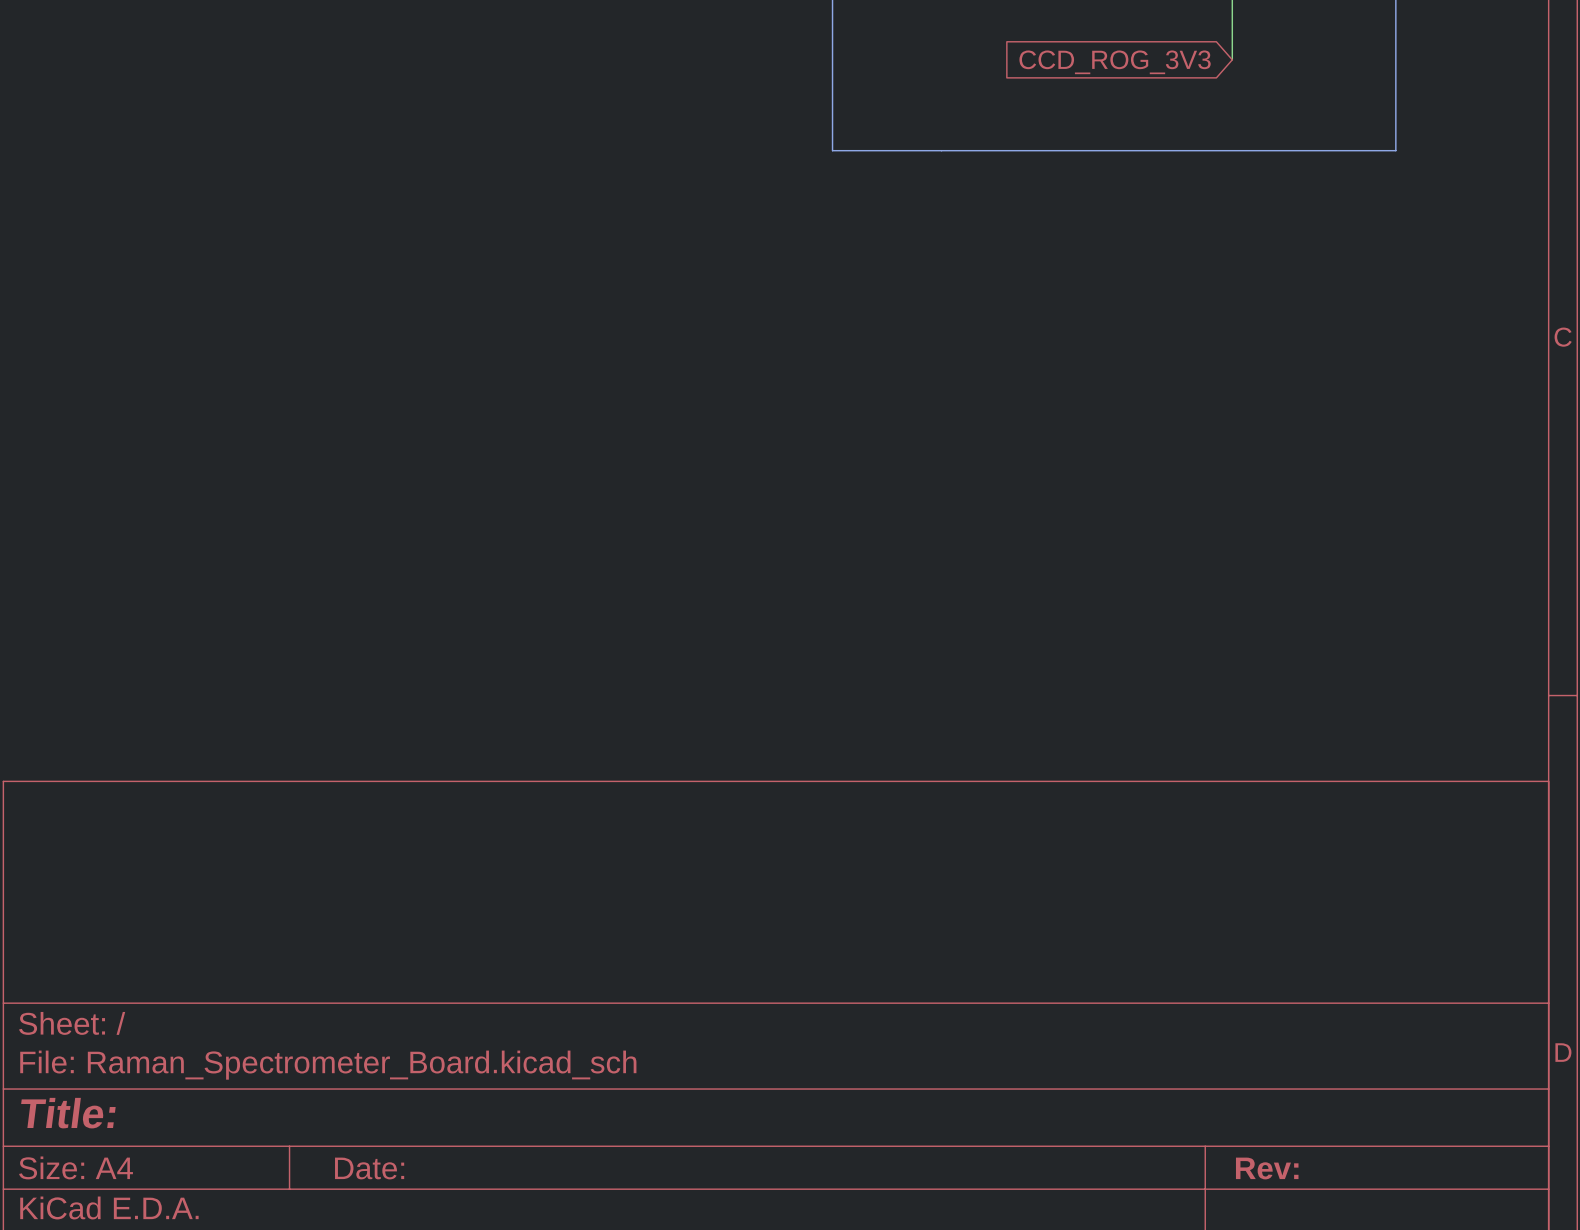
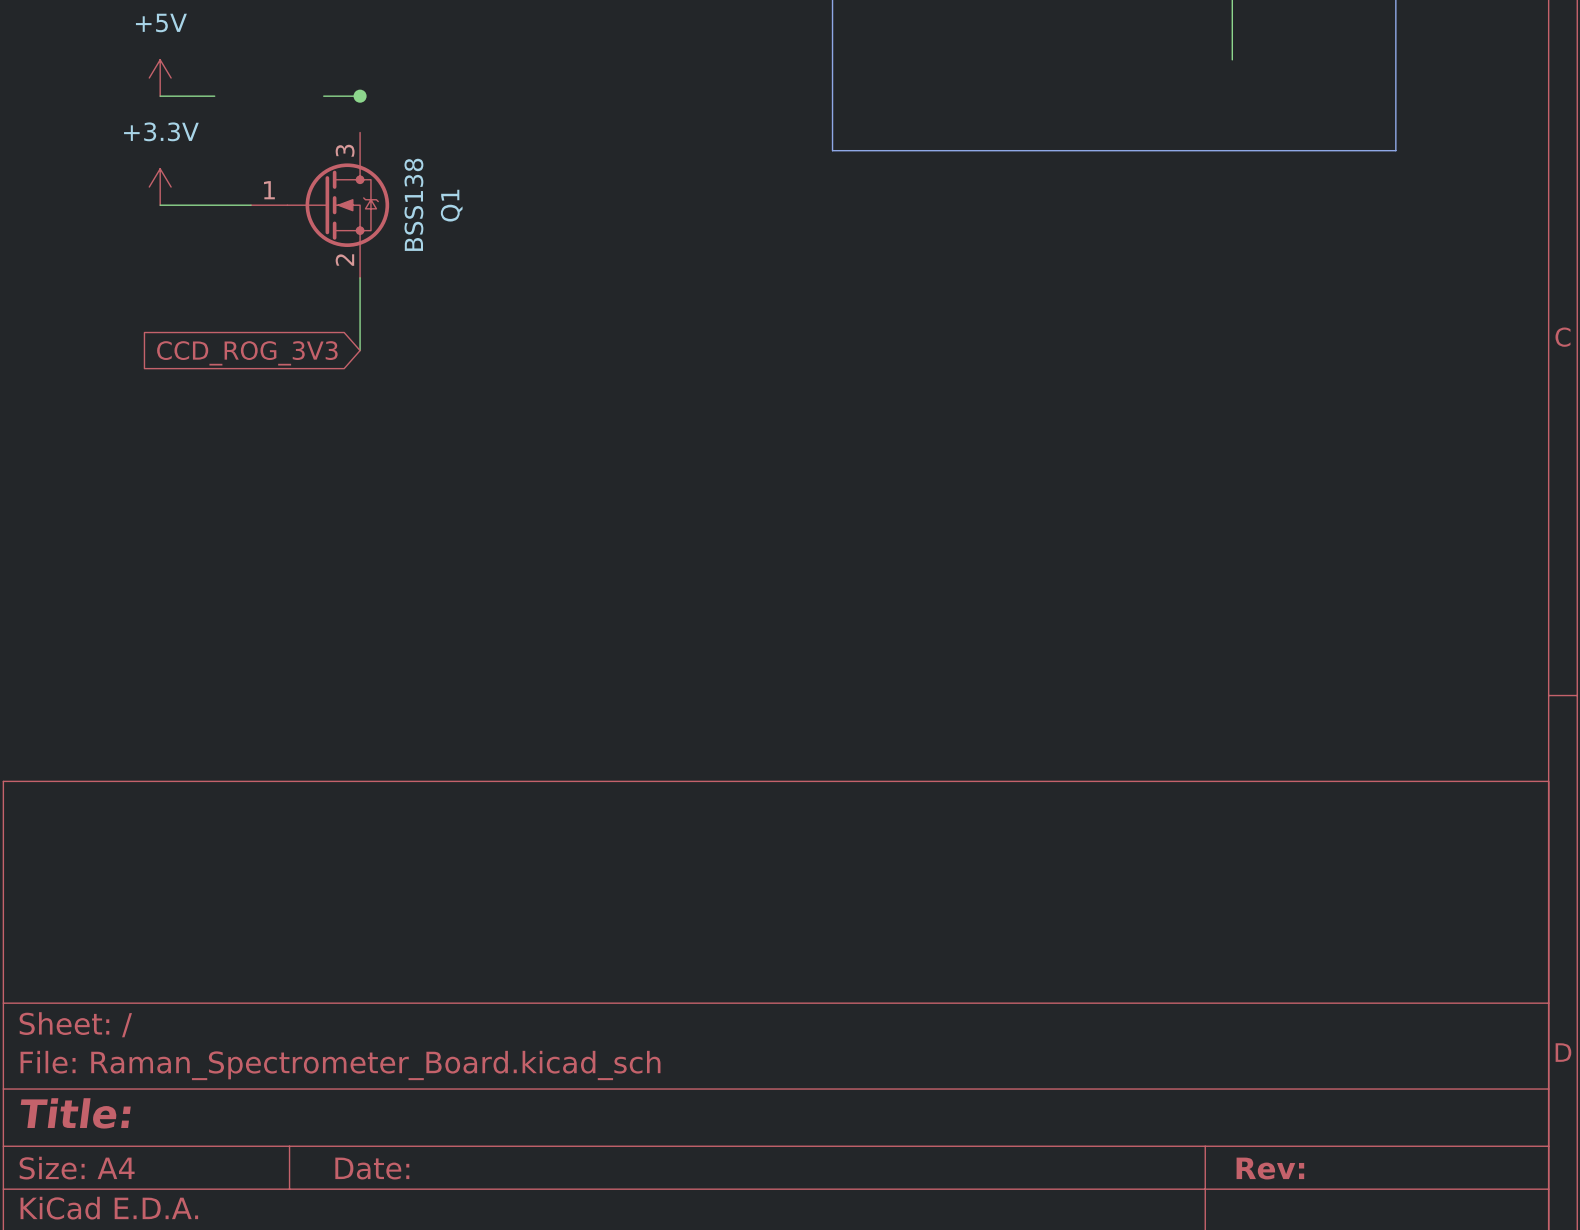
global label: CCD_ROG_3V3 (1115, 62) -> none
power symbol: none -> +5V (160, 78)
wire: none -> (160, 96) (214, 96)
wire: none -> (323, 96) (360, 96)
junction: none -> (360, 96)
power symbol: none -> +3.3V (160, 187)
wire: none -> (160, 205) (251, 205)
Q1: none -> BSS138 (320, 205)
wire: none -> (360, 277) (360, 350)
global label: none -> CCD_ROG_3V3 (247, 353)

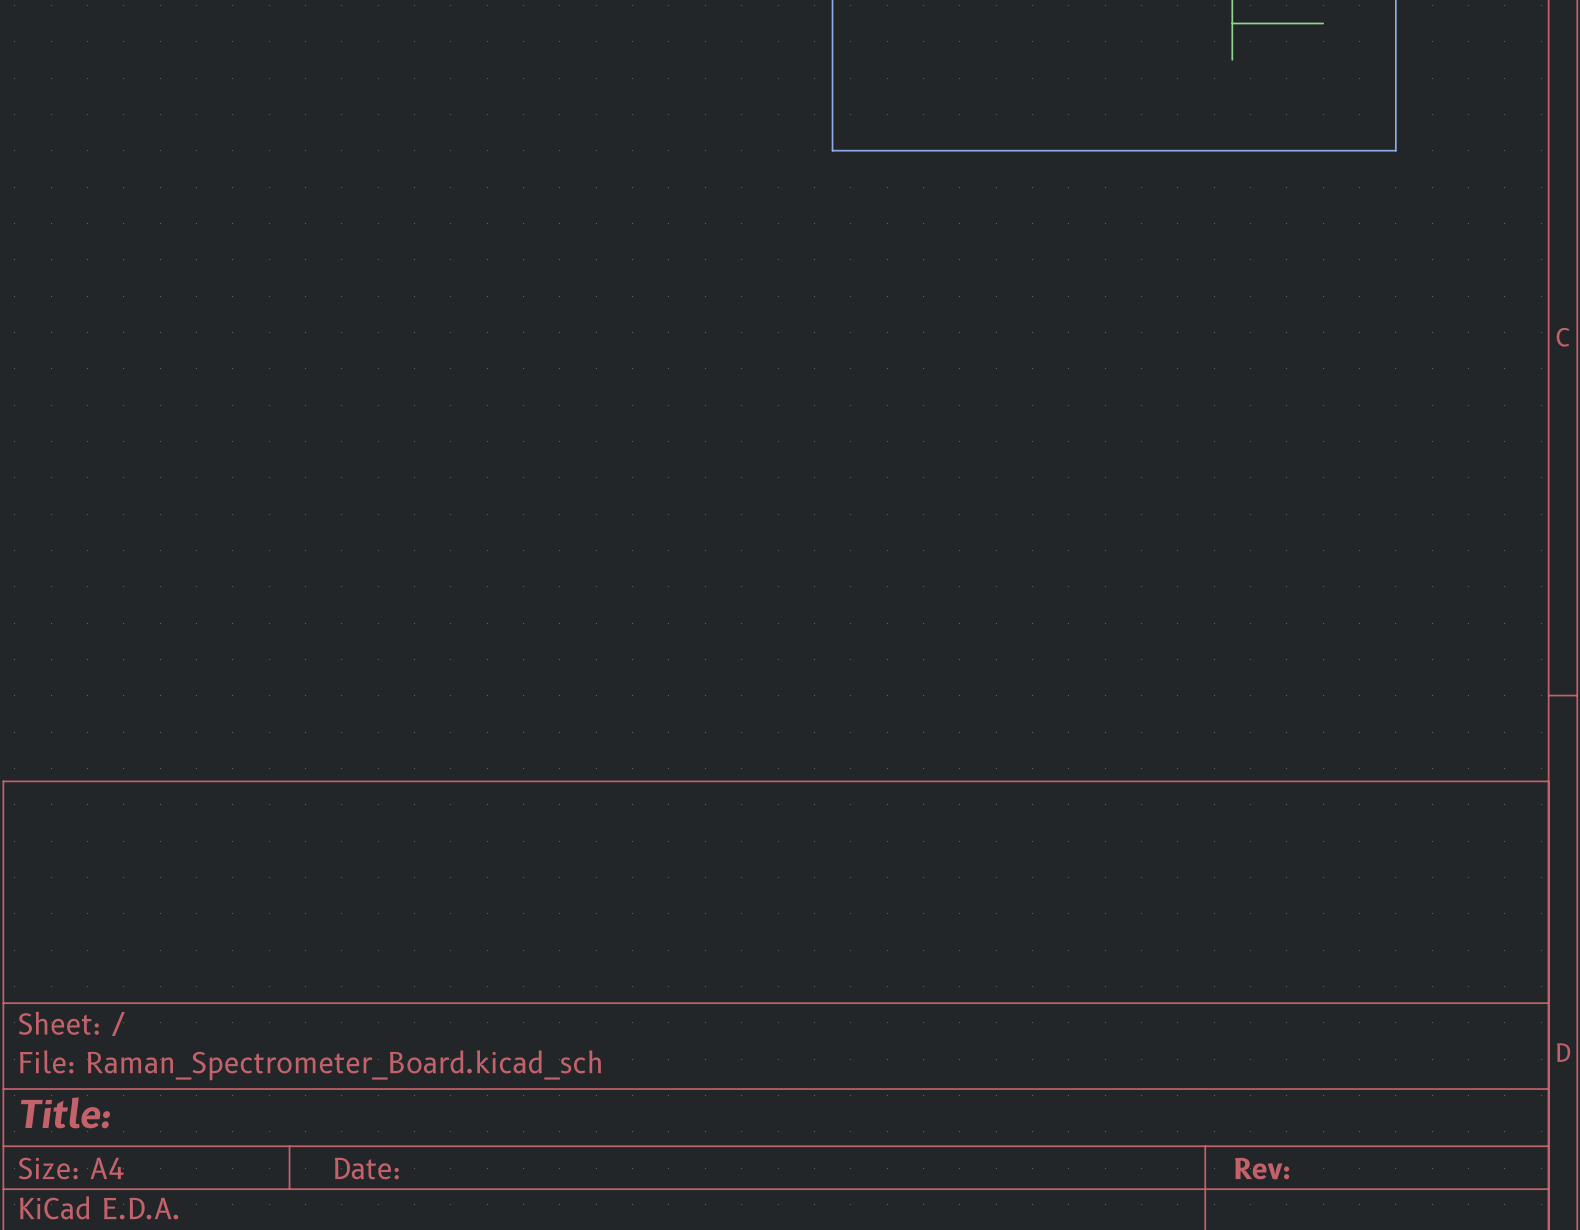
wire: none -> (1232, 23) (1323, 23)
power symbol: +5V (160, 78) -> none
wire: (160, 96) (214, 96) -> none
wire: (323, 96) (360, 96) -> none
junction: (360, 96) -> none
power symbol: +3.3V (160, 187) -> none
wire: (160, 205) (251, 205) -> none
Q1: BSS138 (320, 205) -> none
wire: (360, 277) (360, 350) -> none
global label: CCD_ROG_3V3 (247, 353) -> none

